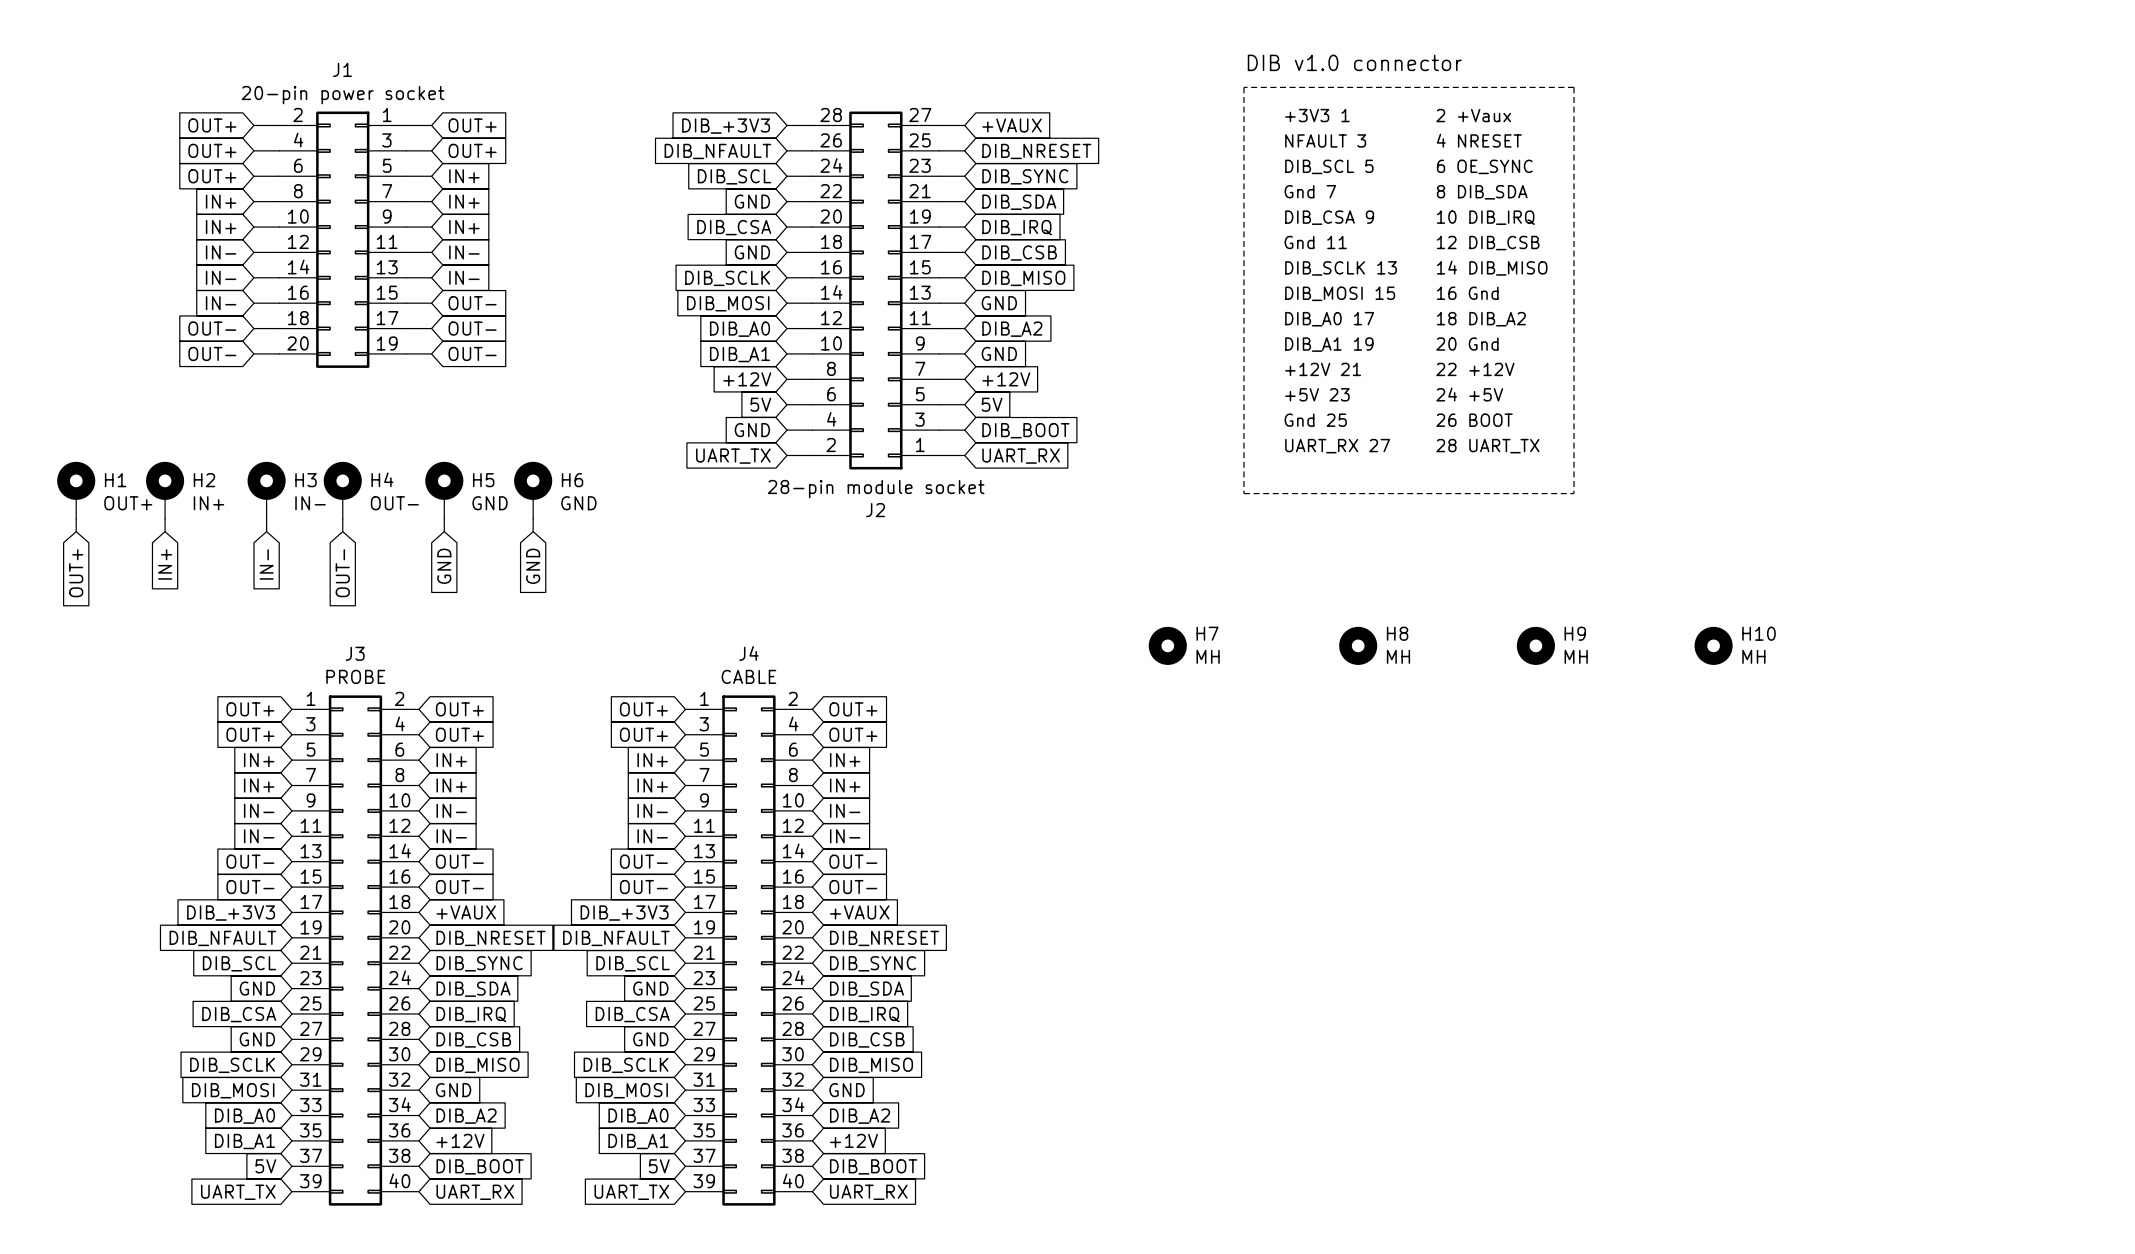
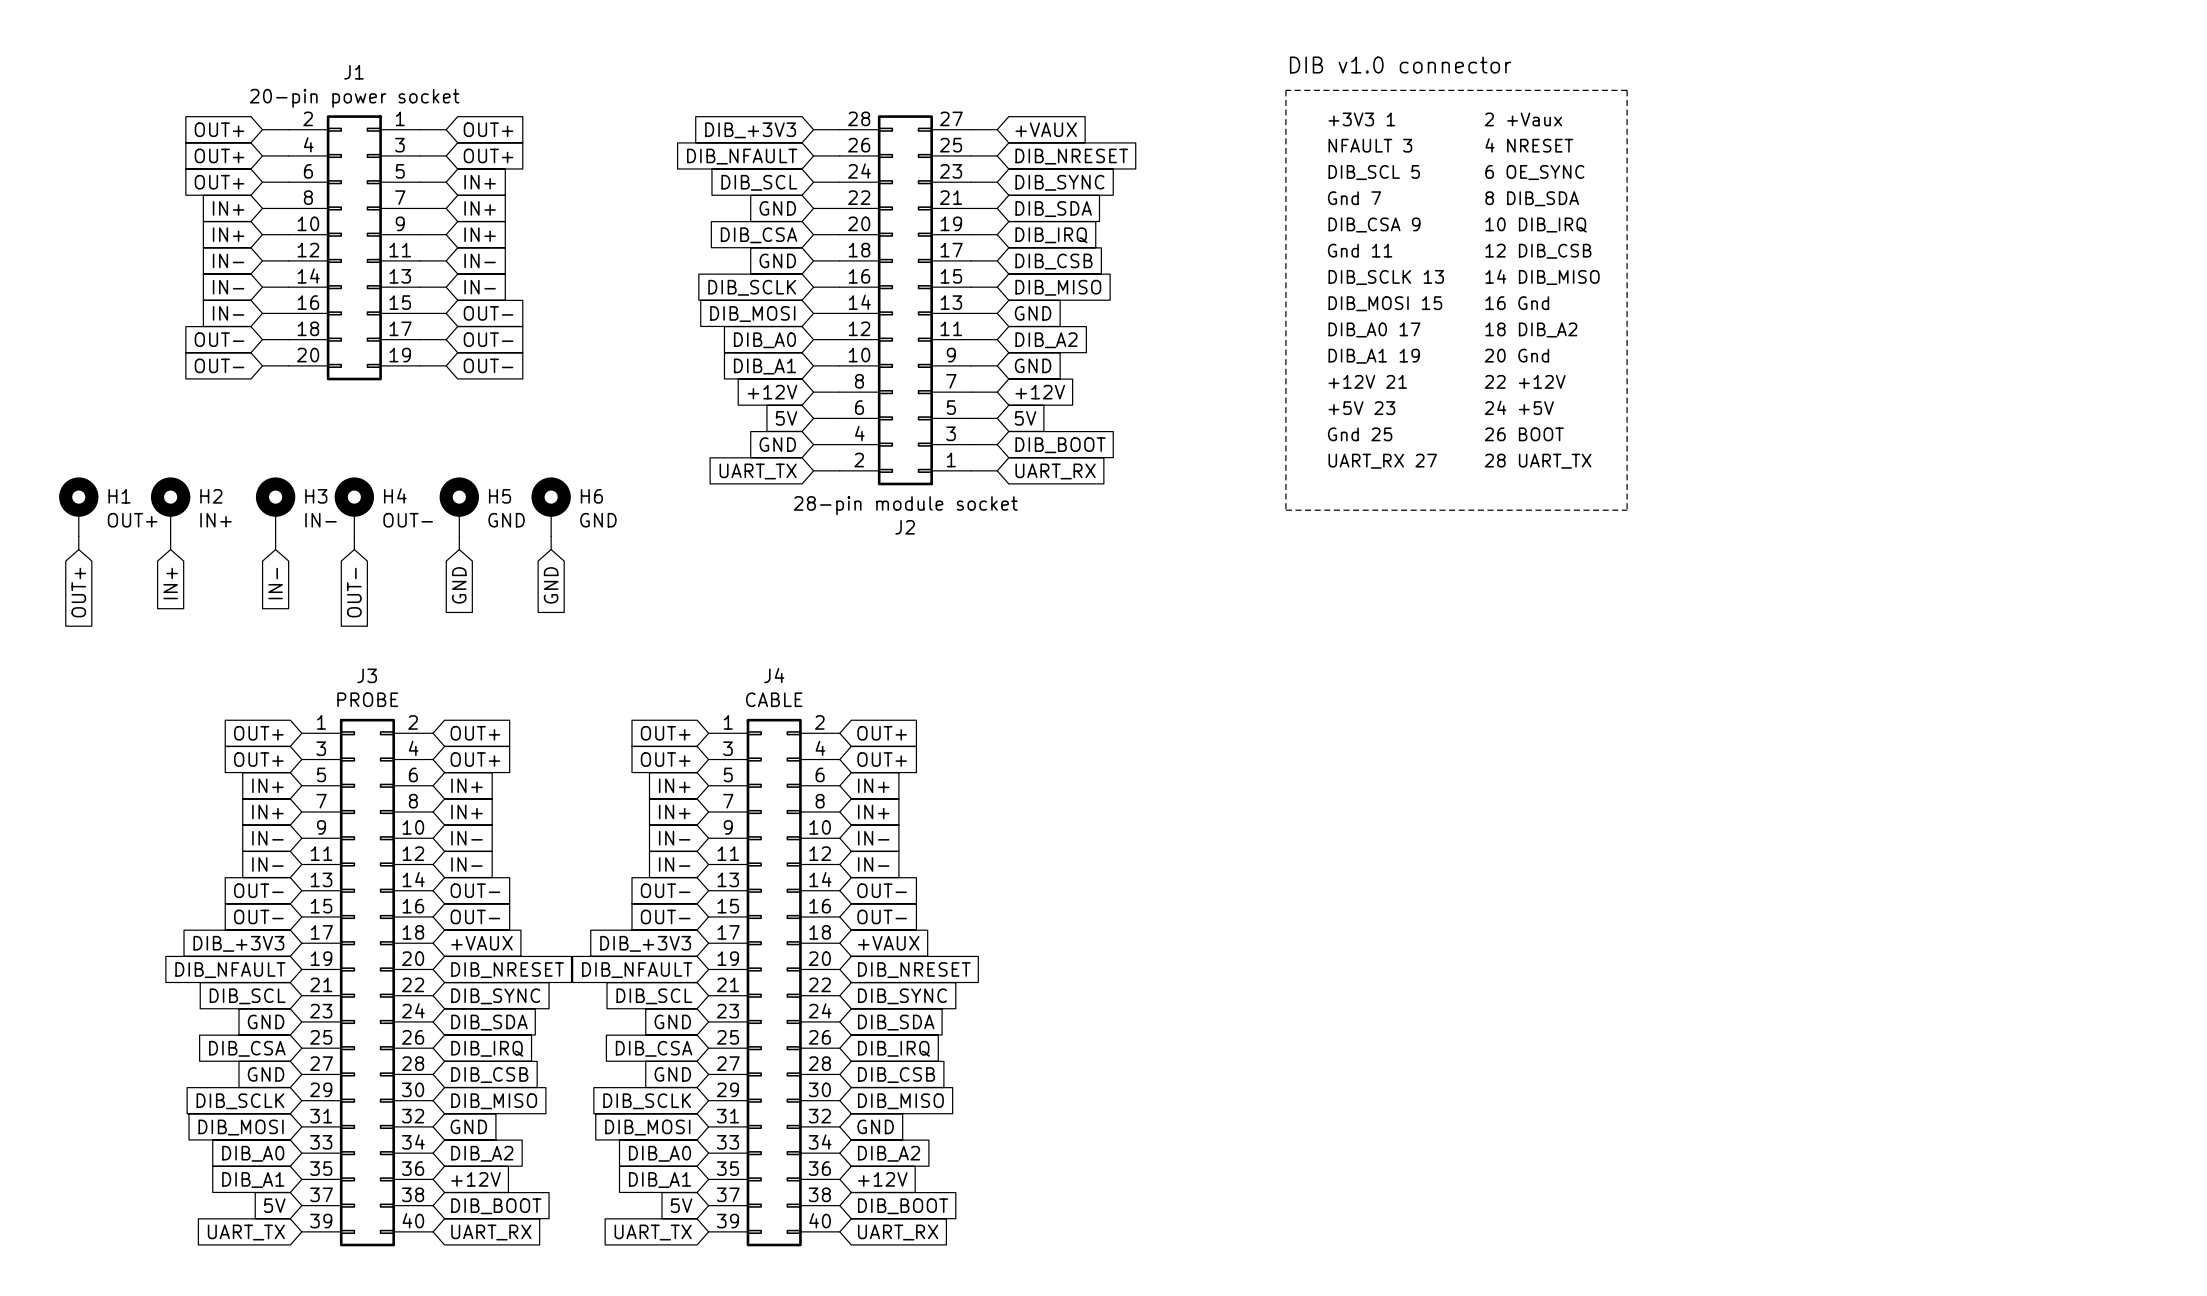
H7: MH (1167, 645) -> none
H8: MH (1358, 645) -> none
H9: MH (1535, 645) -> none
H10: MH (1713, 645) -> none

